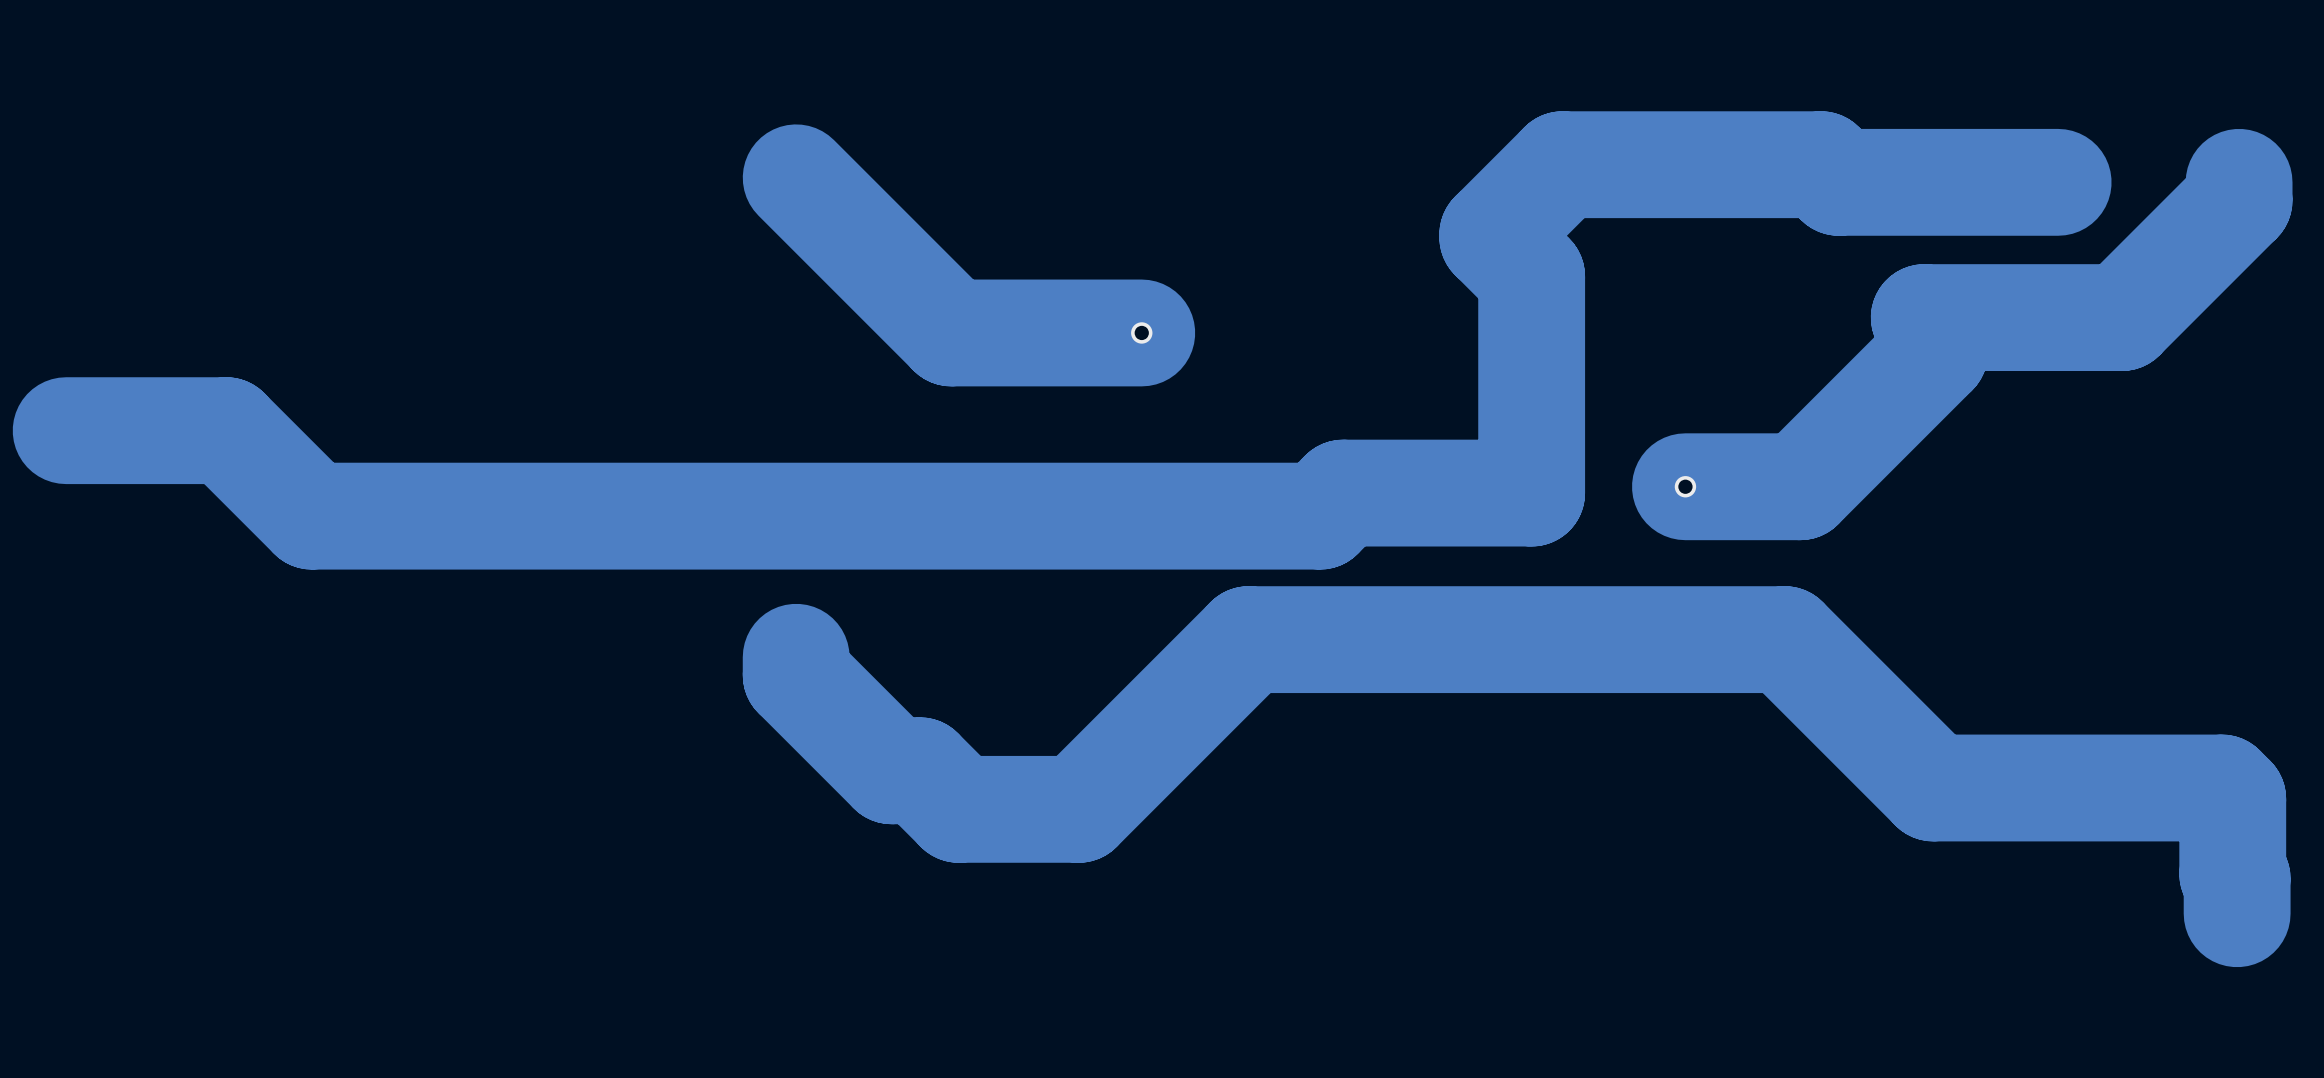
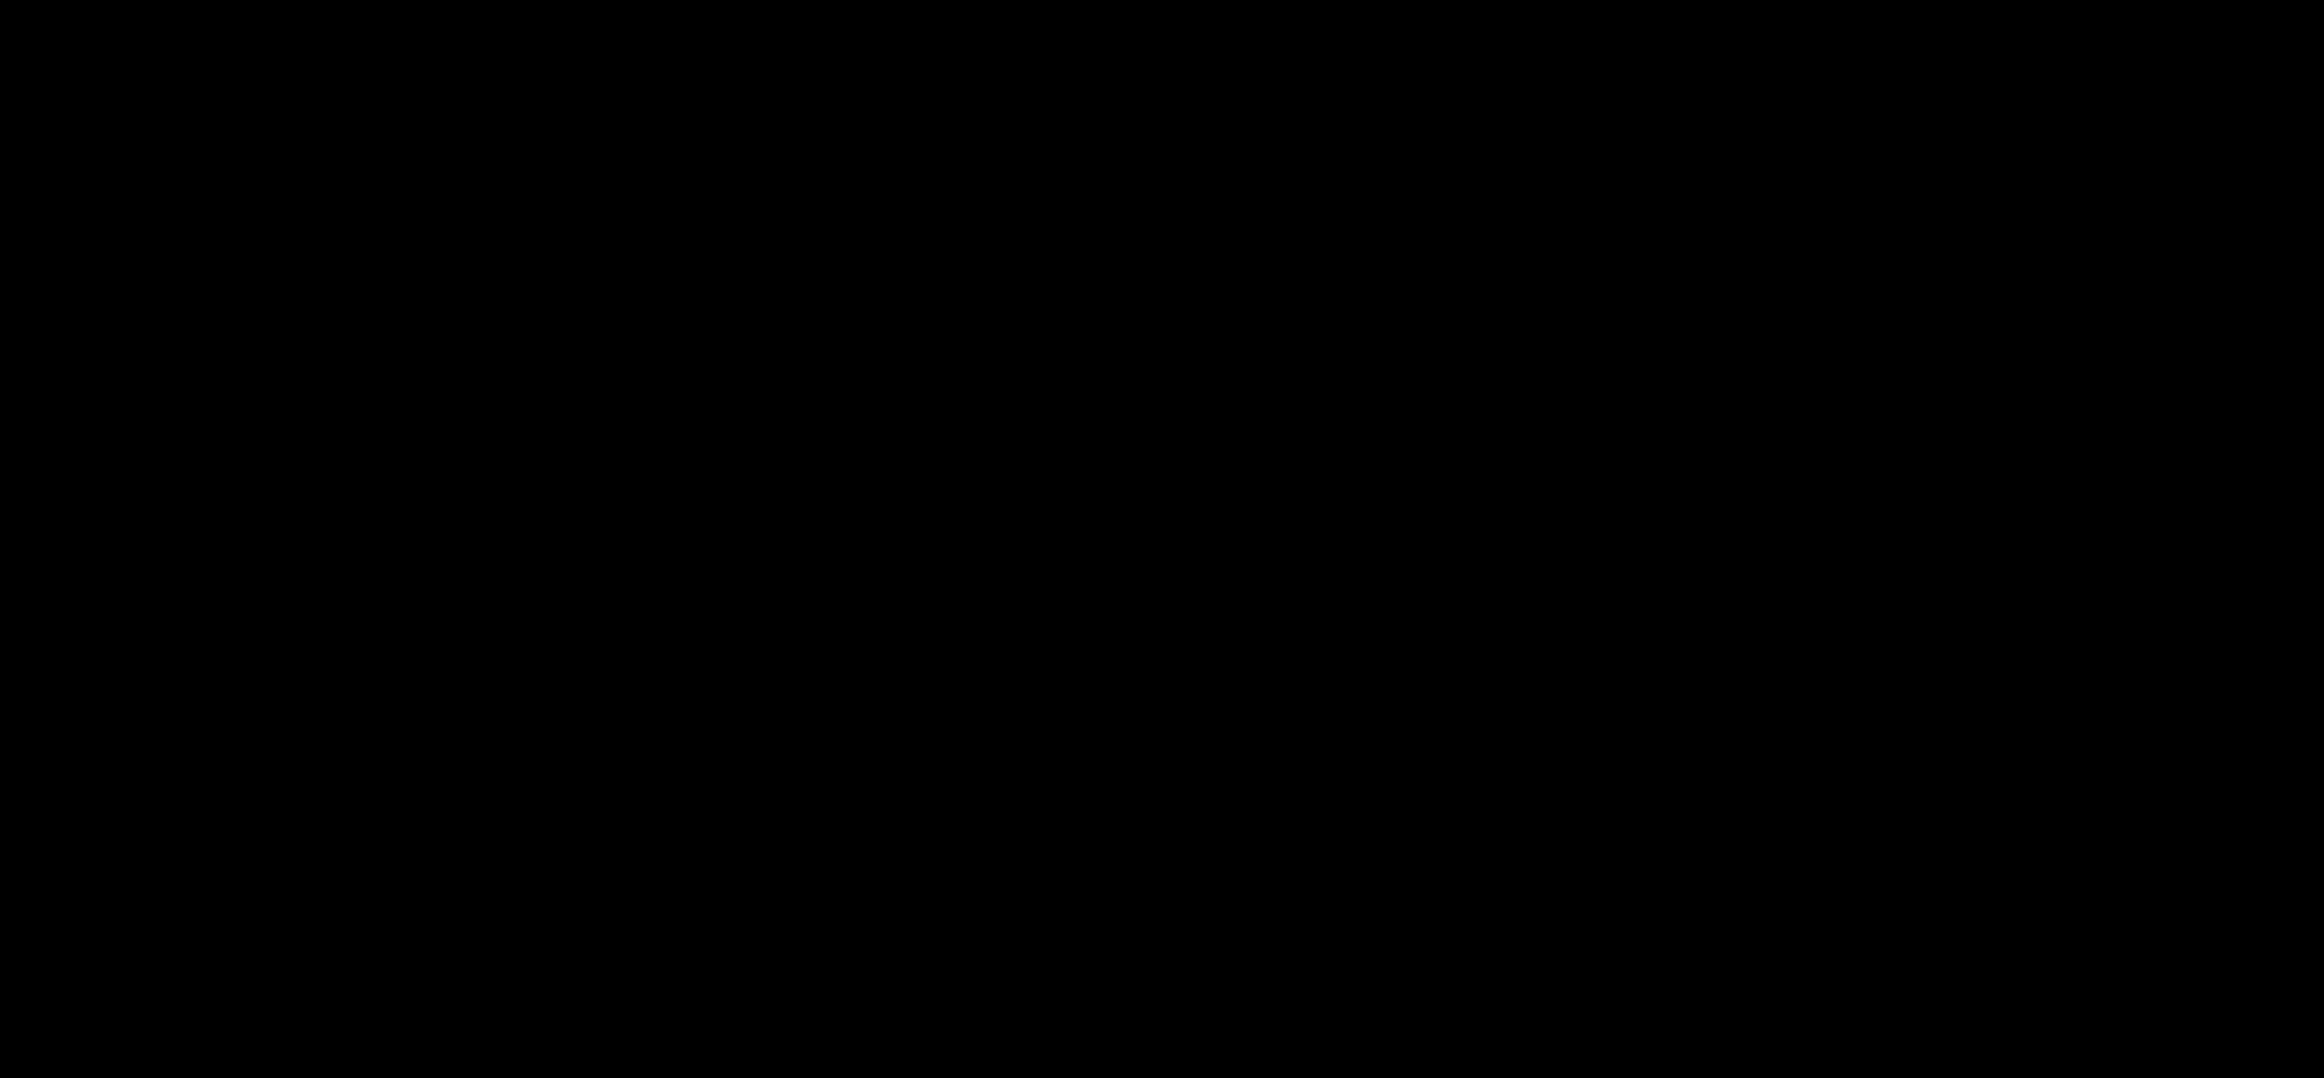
track: (796, 177) (951, 332) (1141, 332) -> none
track: (2058, 182) (1838, 182) (1821, 164) (1562, 164) (1492, 234) (1492, 237) (1531, 276) (1531, 493) (1343, 493) (1320, 516) (311, 516) (226, 430) (66, 430) -> none
track: (2239, 182) (2239, 200) (2121, 317) (1924, 317) (1934, 327) (1934, 352) (1800, 486) (1685, 486) -> none
via: (1141, 332) -> none
via: (1685, 486) -> none
track: (796, 657) (796, 675) (891, 770) (920, 770) (958, 809) (1078, 809) (1248, 639) (1784, 639) (1933, 787) (2221, 787) (2232, 798) (2232, 874) (2237, 878) (2237, 913) -> none

